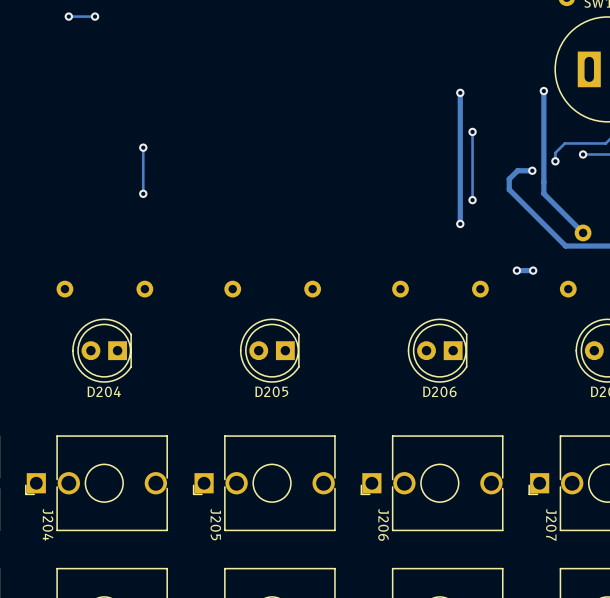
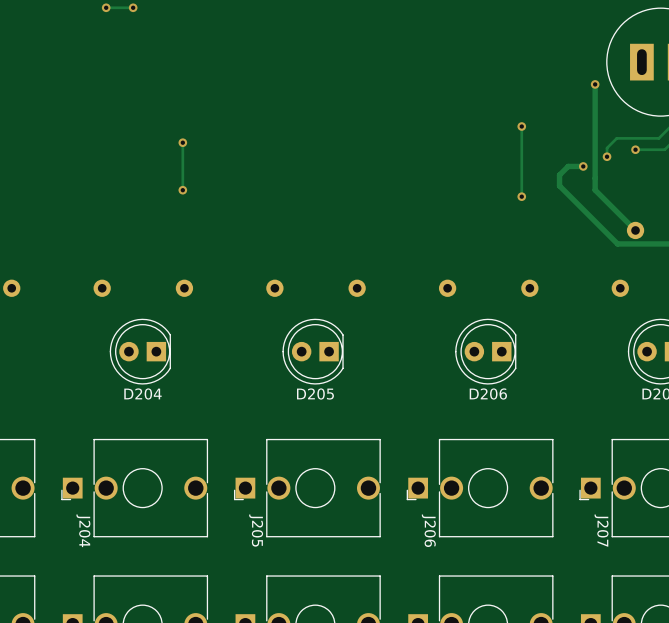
track: (460, 92) (460, 223) -> none
via: (460, 92) -> none
via: (460, 223) -> none
via: (516, 270) -> none
track: (533, 270) (516, 270) -> none
via: (533, 270) -> none

